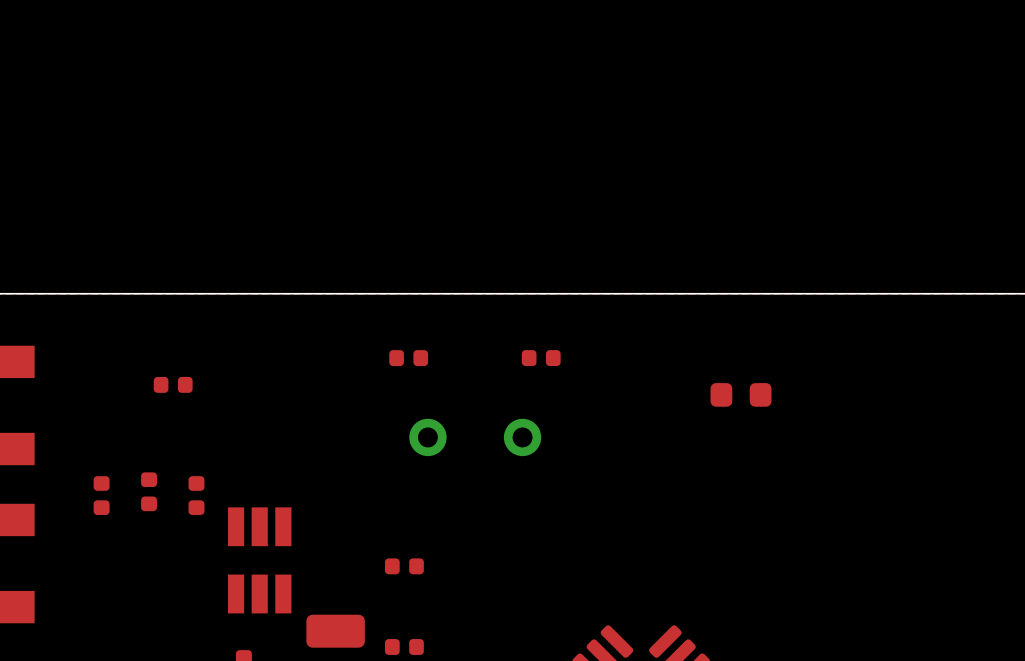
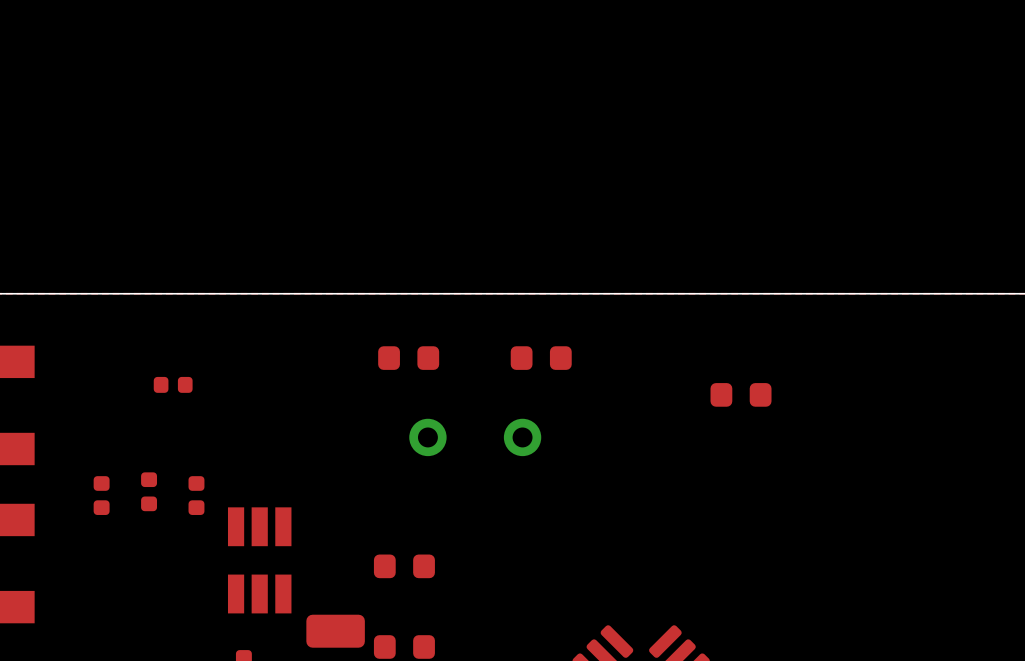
part footprint: [389, 350, 429, 367] -> [378, 346, 440, 370]
part footprint: [521, 350, 561, 367] -> [510, 346, 572, 370]
part footprint: [385, 558, 424, 575] -> [373, 554, 435, 579]
part footprint: [385, 639, 424, 655] -> [373, 635, 435, 659]

